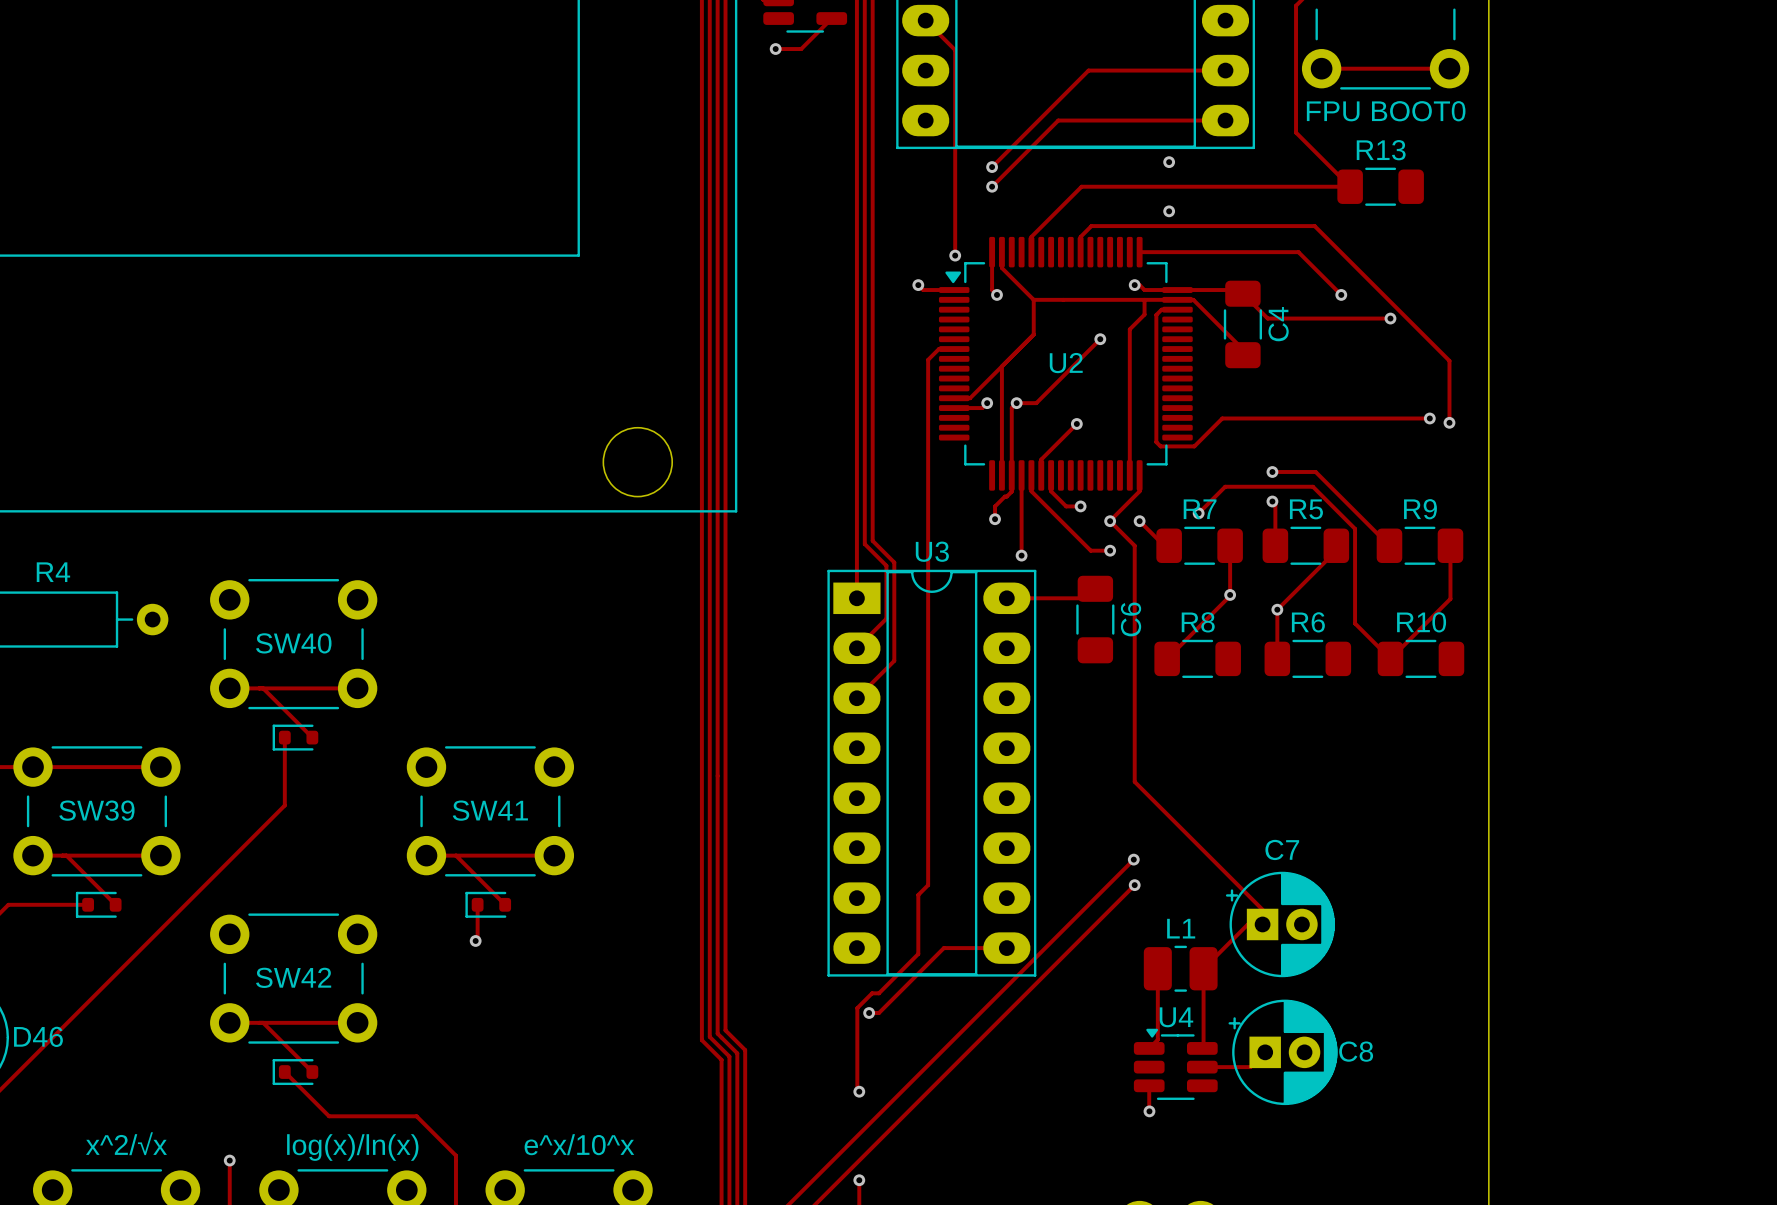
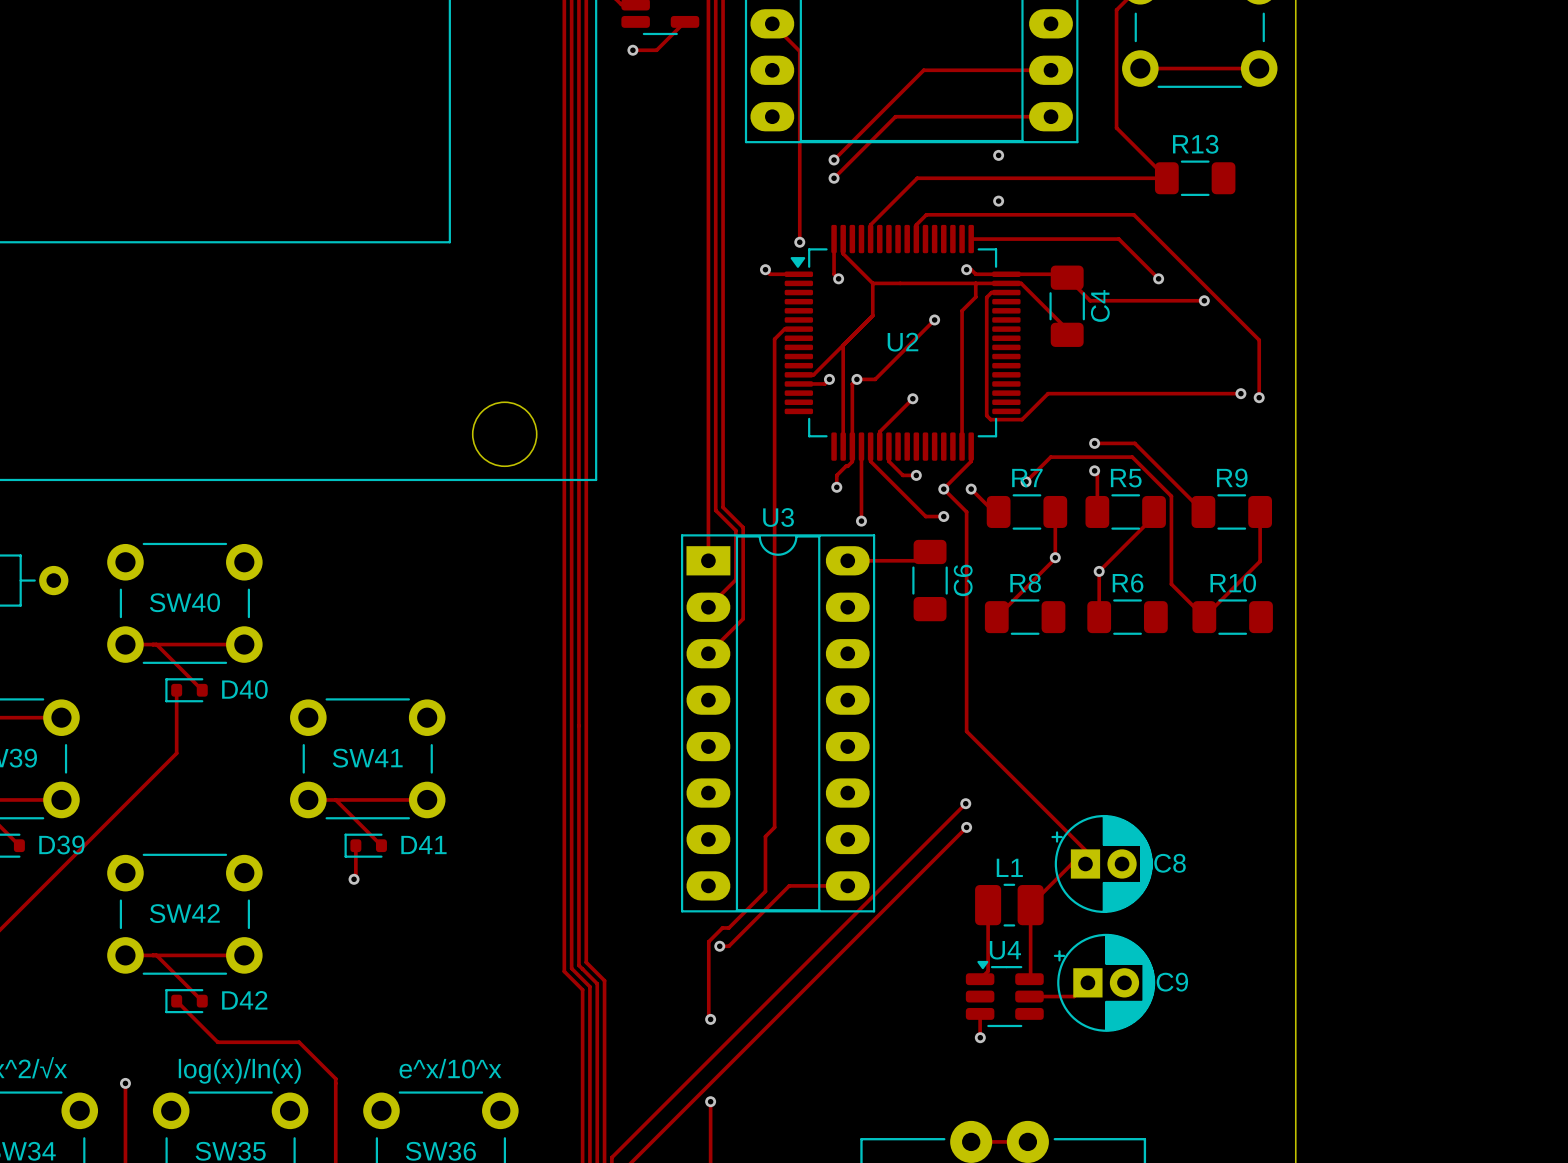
part value: FPU BOOT0 (1386, 111) -> none
D40 name: none -> D40 (244, 689)
C7 name: C7 (1282, 849) -> C8 (1170, 863)
D39 name: none -> D39 (61, 845)
D41 name: none -> D41 (423, 845)
C8 name: C8 (1356, 1051) -> C9 (1172, 982)
D42 name: none -> D42 (244, 1000)

